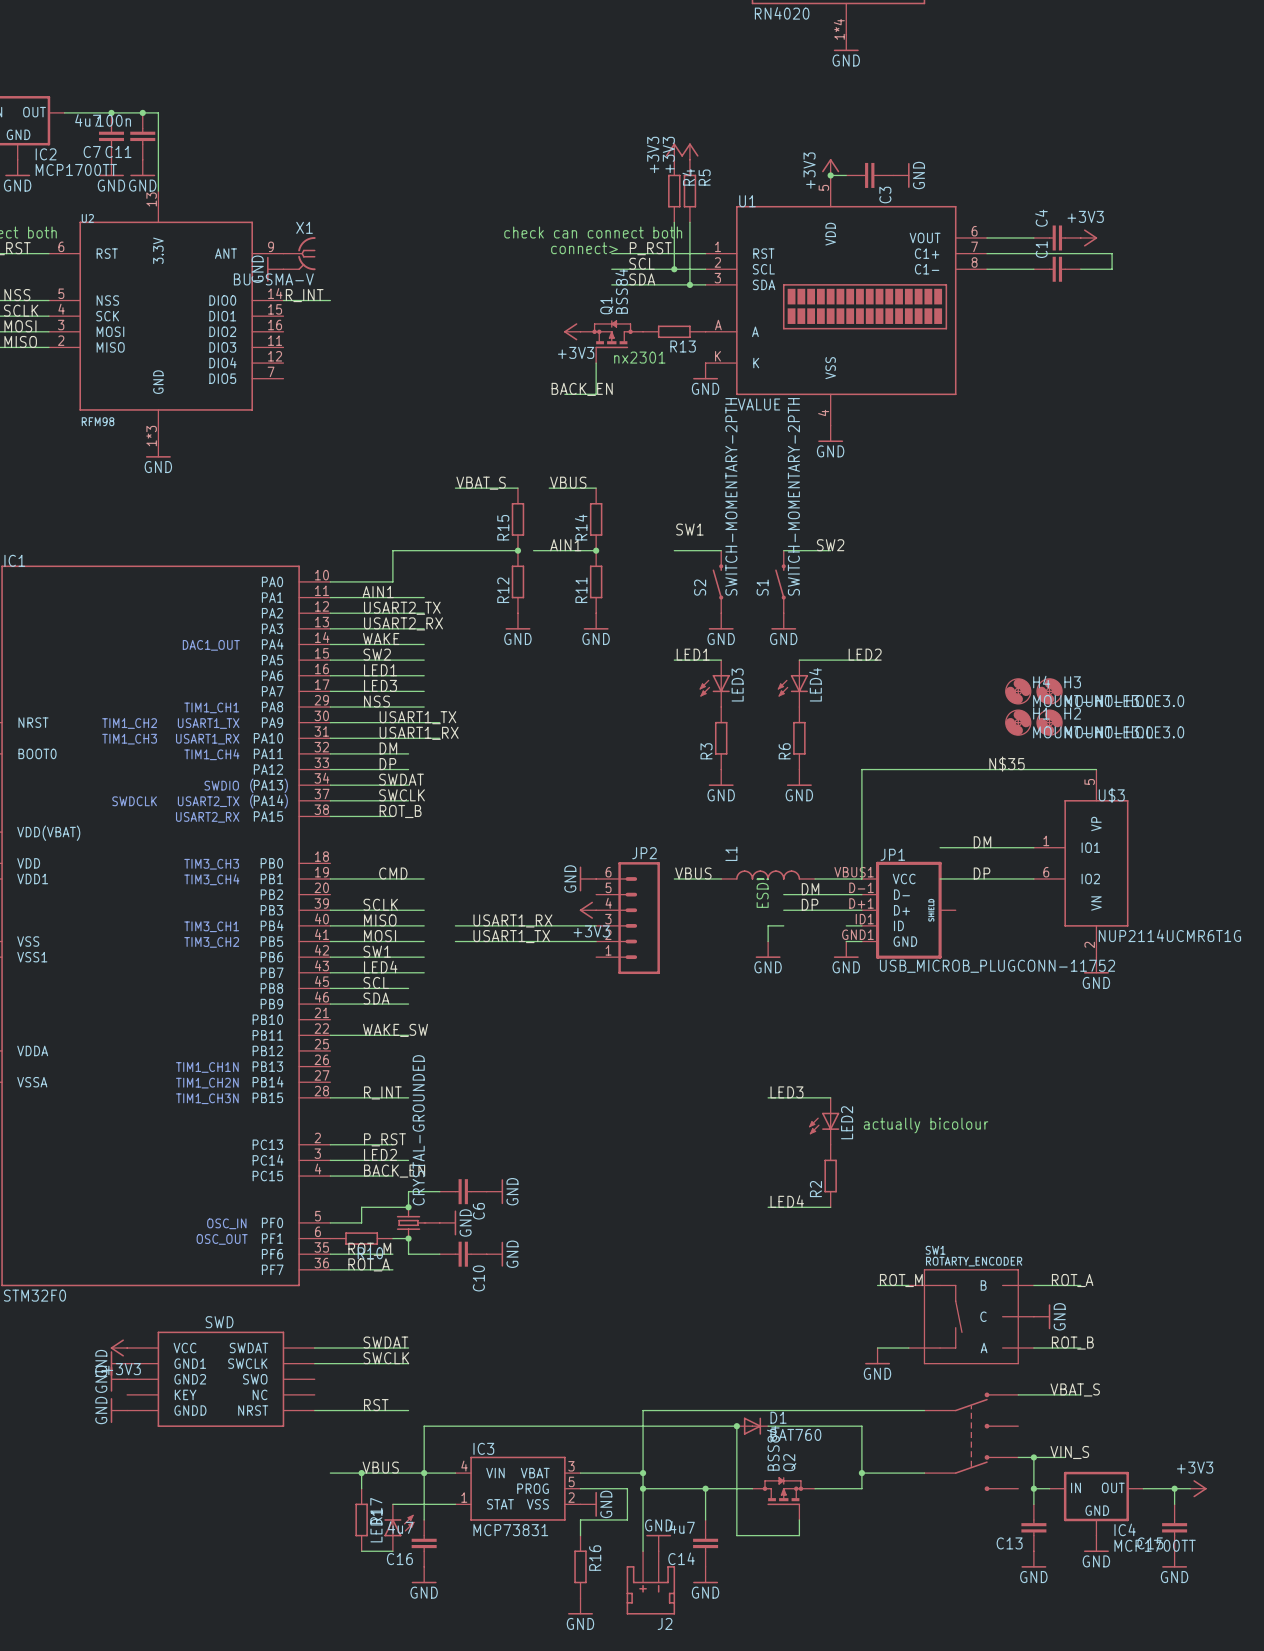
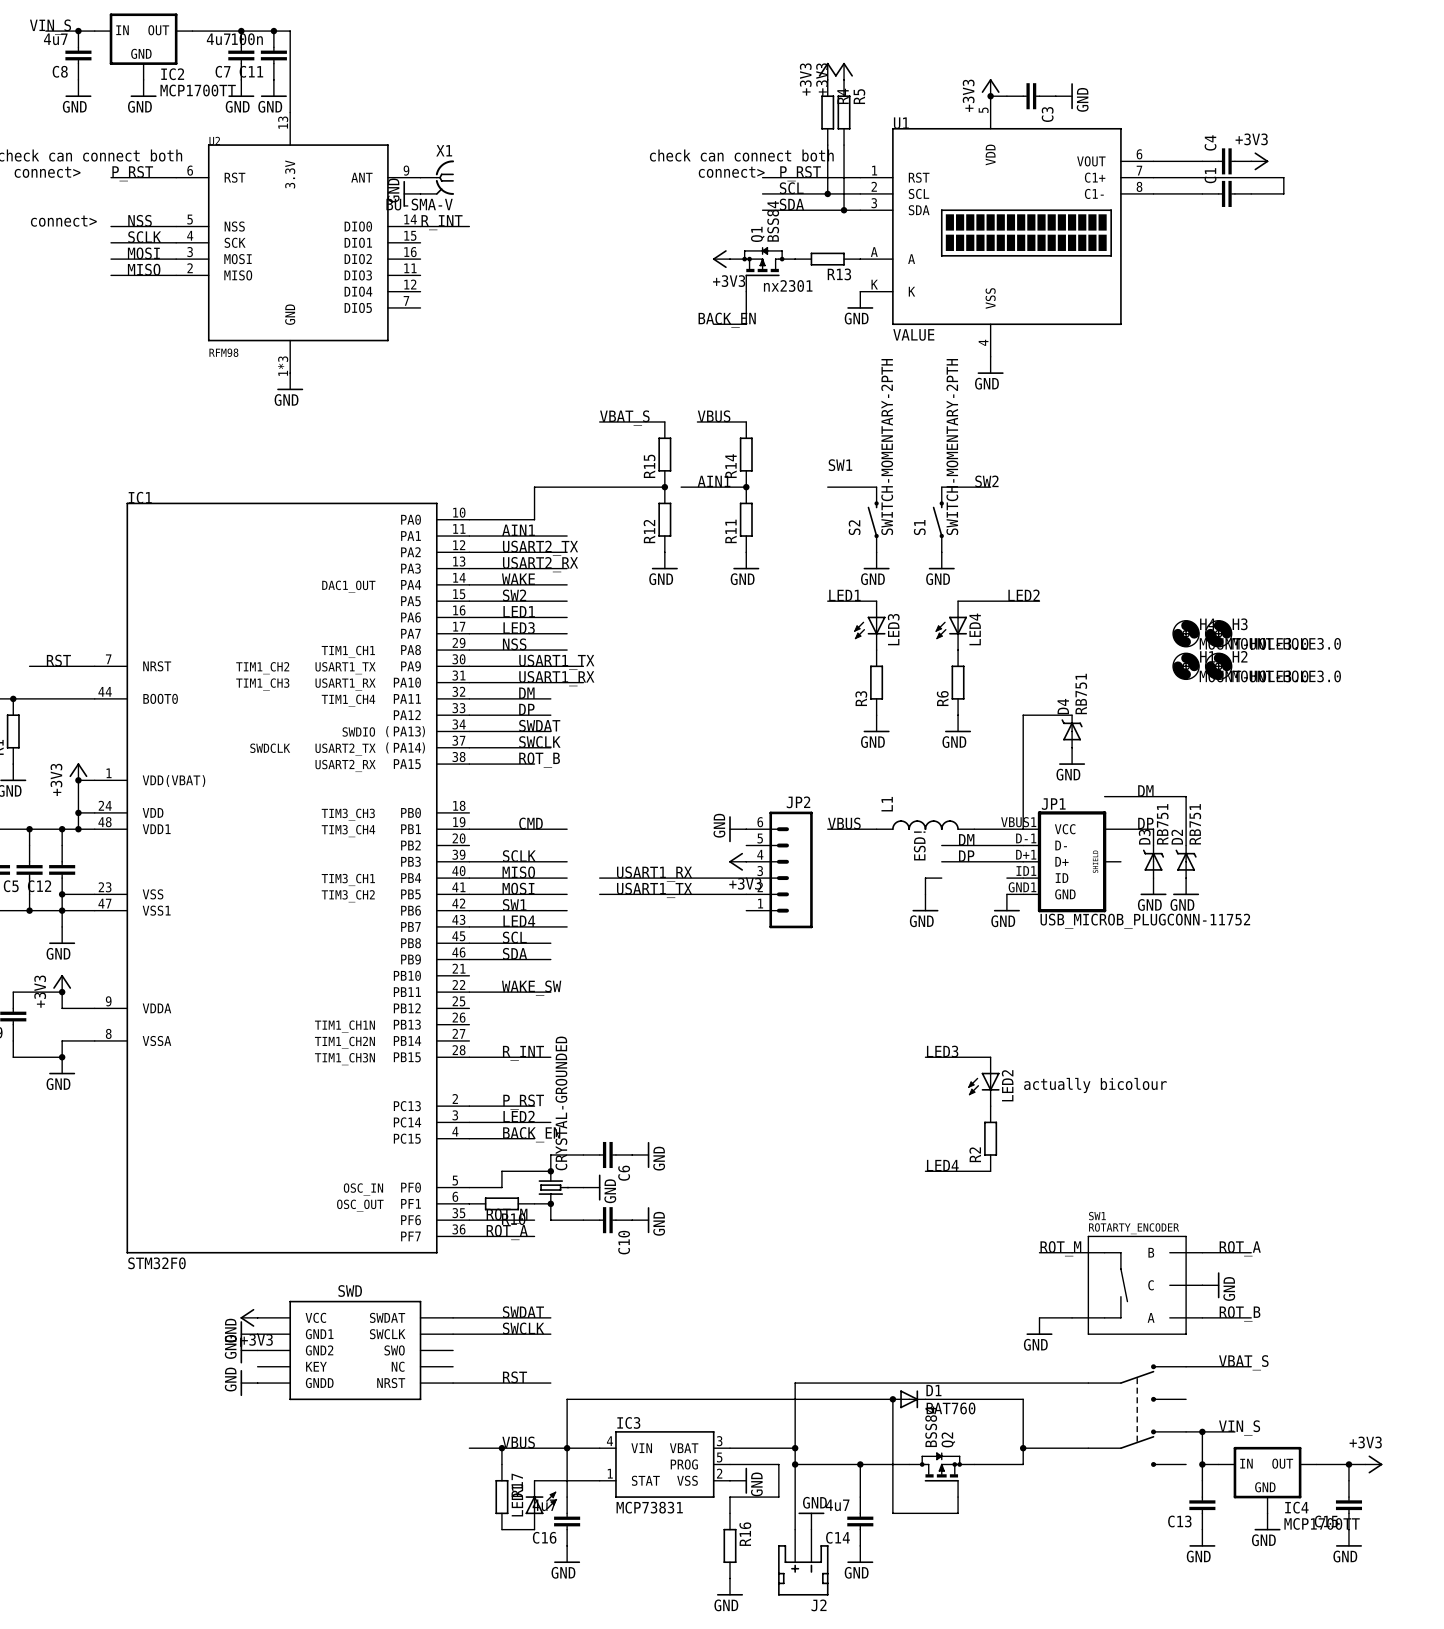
label: N$35 (1007, 764) -> none
wire: (908, 769) (1096, 769) -> none
D4: none -> RB751 (1072, 731)
power symbol: none -> GND (1072, 756)
wire: (1018, 847) (1033, 847) -> (1186, 796) (1186, 845)
U$3: NUP2114UCMR6T1G (1081, 863) -> none
wire: (986, 878) (1033, 878) -> (1153, 829) (1153, 845)
D3: none -> RB751 (1153, 861)
D2: none -> RB751 (1186, 861)
power symbol: none -> GND (1153, 886)
power symbol: none -> GND (1186, 886)
power symbol: GND (1096, 965) -> none

